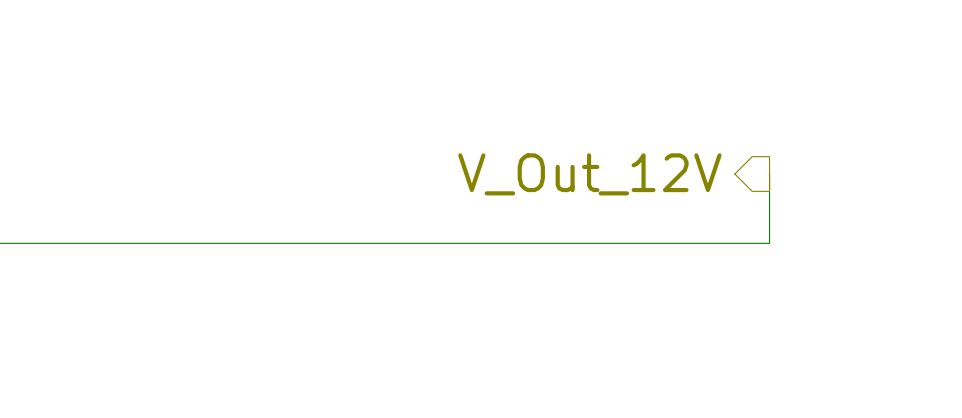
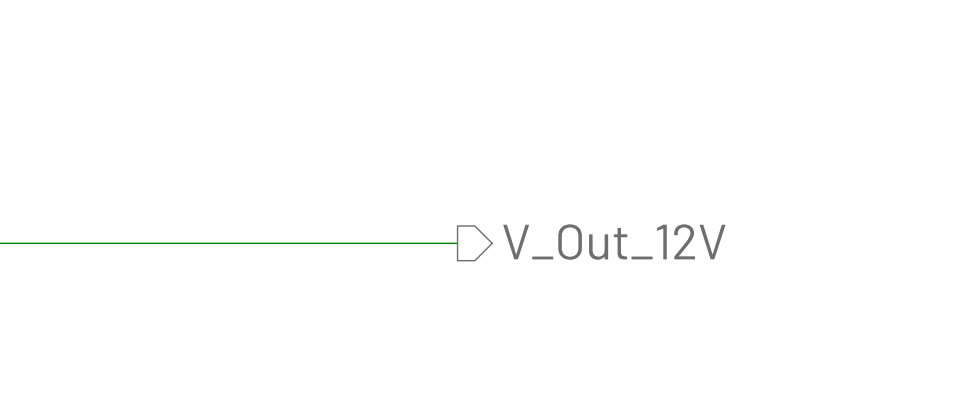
hierarchical label rotation: 0° (589, 174) -> 180° (614, 242)
wire: (769, 174) (769, 243) (457, 243) -> none

